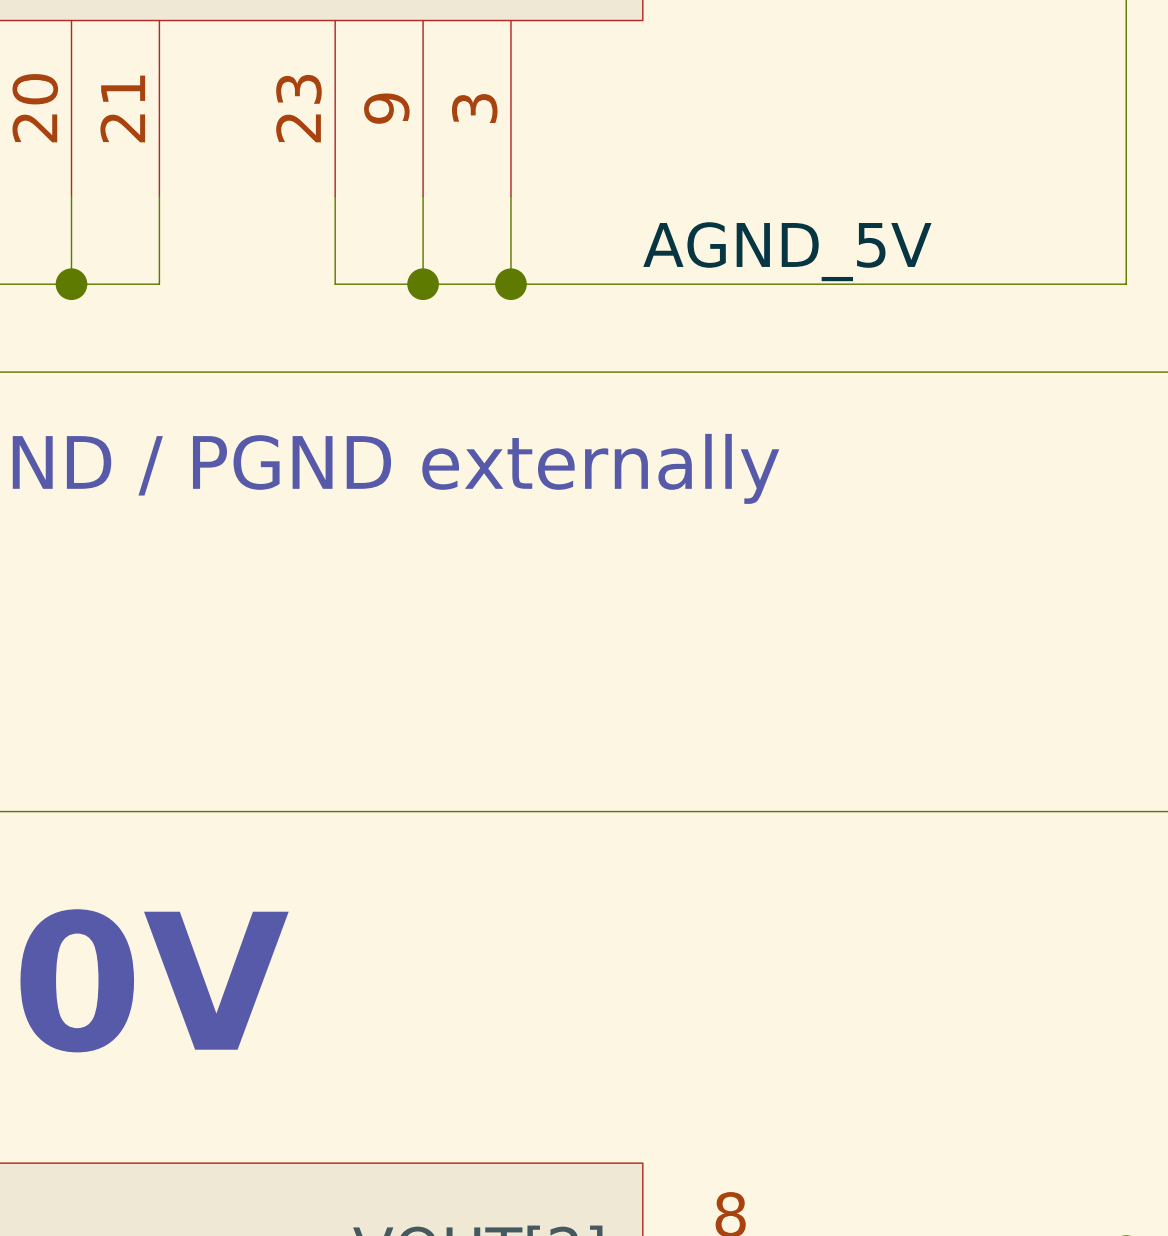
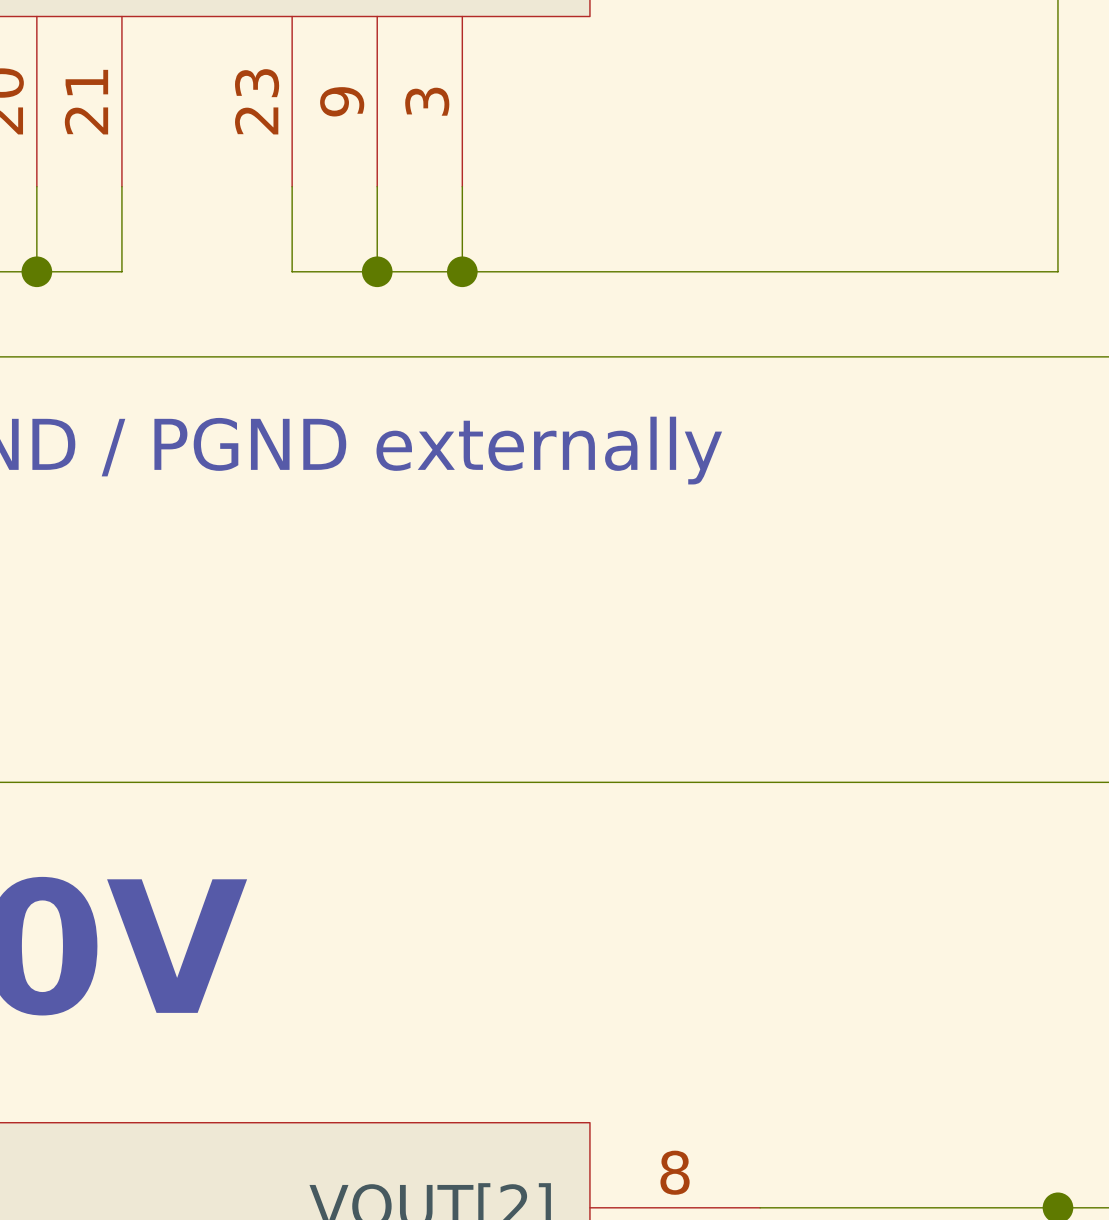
label: AGND_5V (787, 251) -> none

